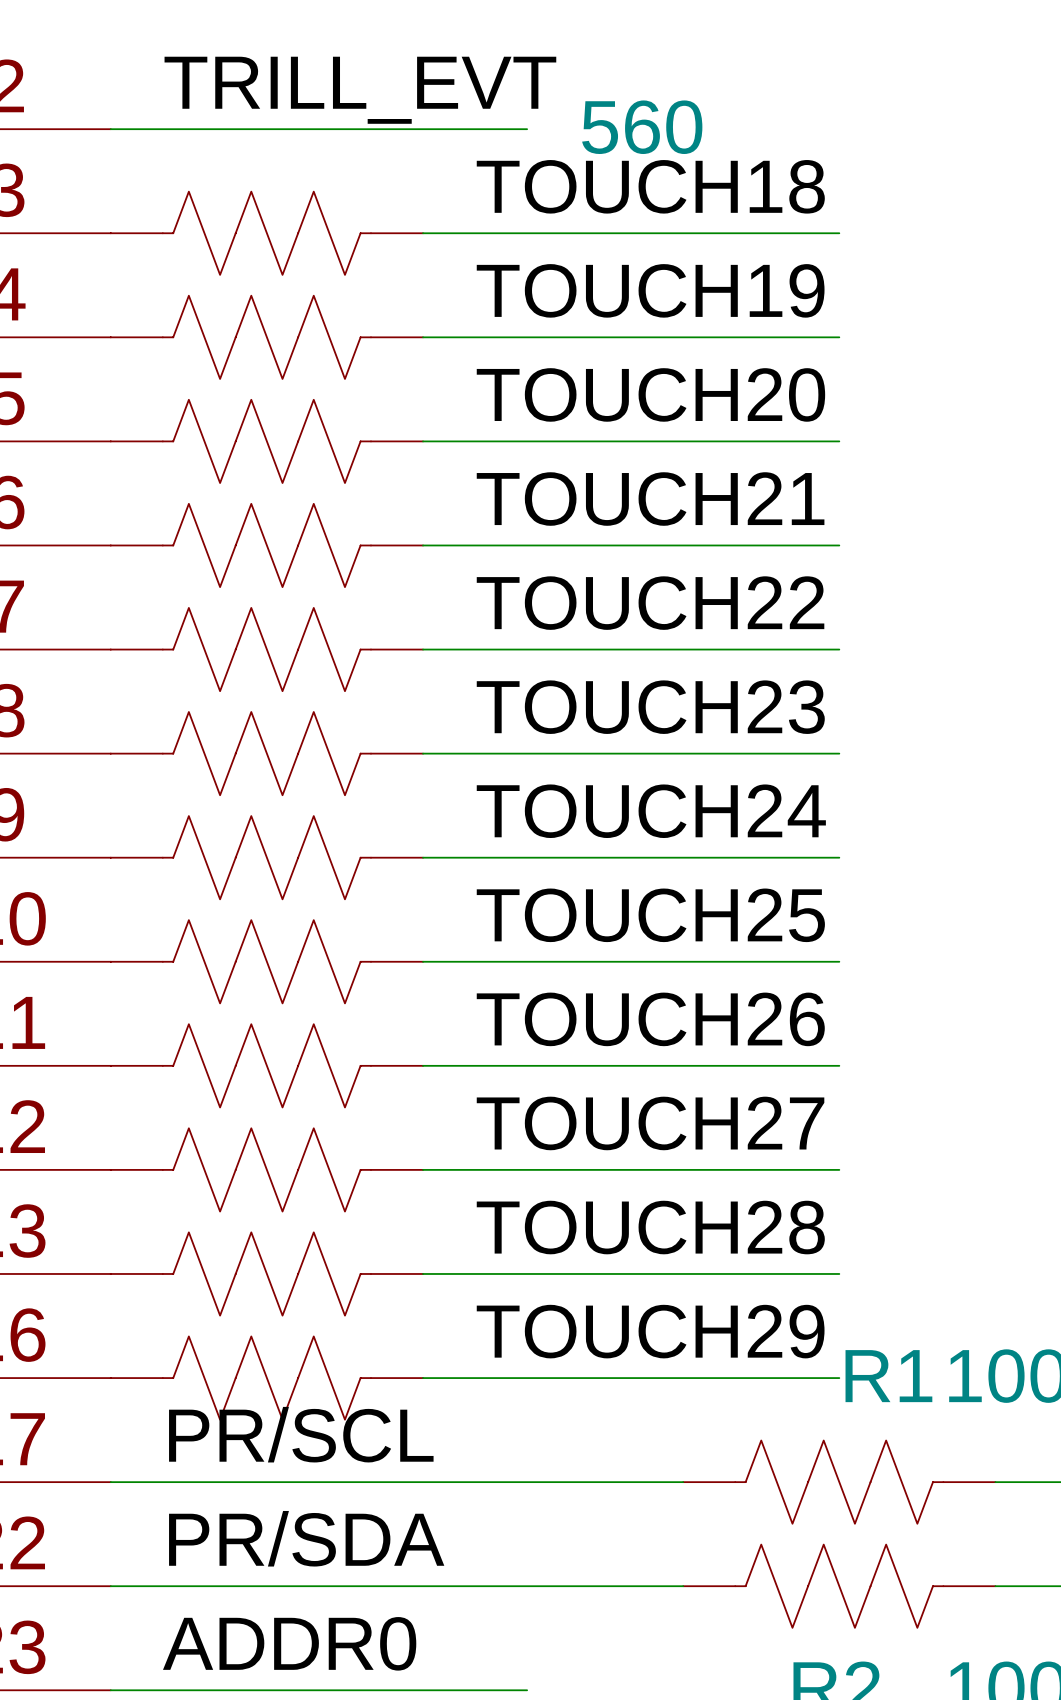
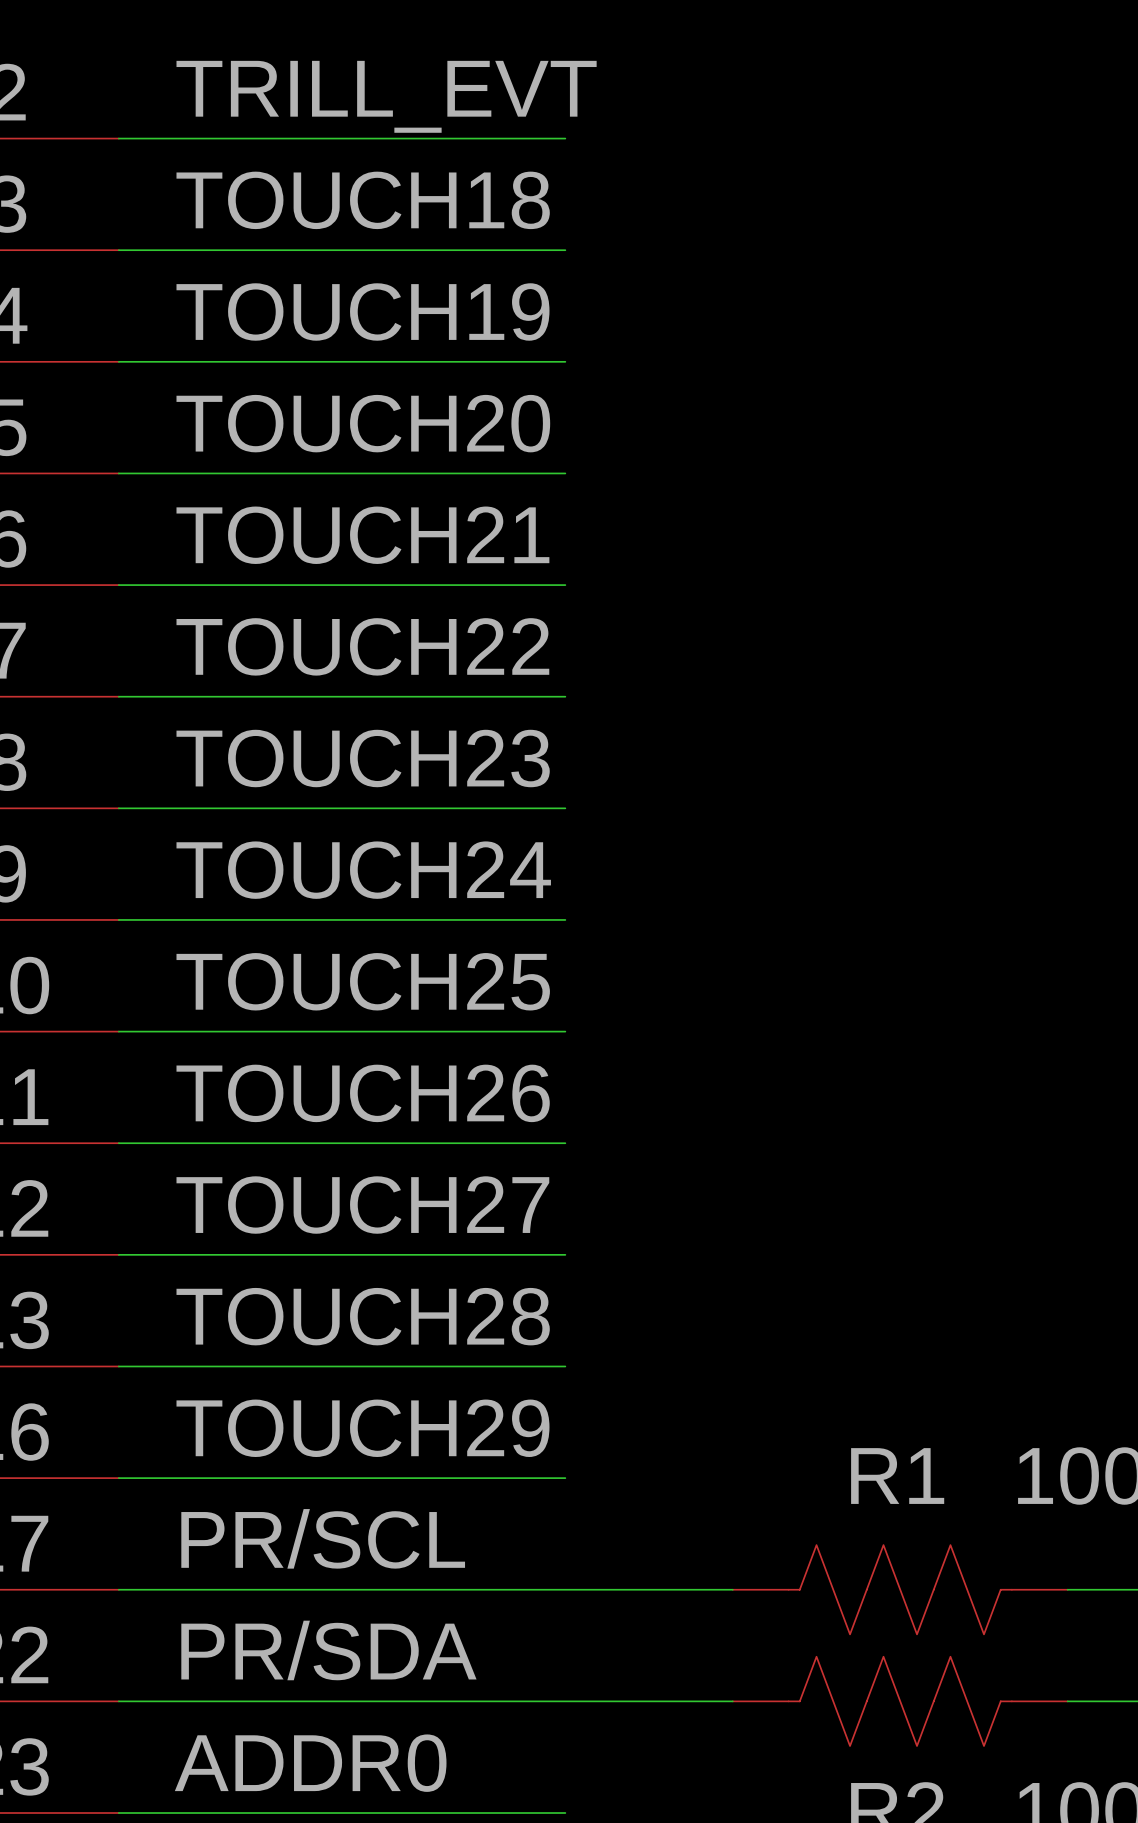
label position: TOUCH18 (650, 186) -> TOUCH18 (363, 200)
part: 560 (266, 233) -> none
wire: (527, 233) (839, 233) -> (118, 250) (453, 250)
label position: TOUCH19 (650, 290) -> TOUCH19 (362, 311)
part: (266, 337) -> none
wire: (527, 337) (839, 337) -> (118, 361) (453, 361)
label position: TOUCH20 (650, 394) -> TOUCH20 (363, 423)
part: (266, 441) -> none
wire: (527, 441) (839, 441) -> (118, 473) (453, 473)
label position: TOUCH21 (650, 499) -> TOUCH21 (362, 535)
part: (266, 545) -> none
wire: (527, 545) (839, 545) -> (118, 585) (453, 585)
label position: TOUCH22 (650, 603) -> TOUCH22 (362, 646)
part: (266, 649) -> none
wire: (527, 649) (839, 649) -> (118, 696) (453, 696)
label position: TOUCH23 (650, 707) -> TOUCH23 (363, 758)
part: (266, 753) -> none
wire: (527, 753) (839, 753) -> (118, 808) (453, 808)
label position: TOUCH24 (651, 811) -> TOUCH24 (363, 870)
part: (266, 857) -> none
wire: (527, 857) (839, 857) -> (118, 919) (453, 919)
label position: TOUCH25 (650, 915) -> TOUCH25 (363, 981)
part: (266, 961) -> none
wire: (527, 961) (839, 961) -> (118, 1031) (453, 1031)
label position: TOUCH26 (650, 1019) -> TOUCH26 (363, 1093)
part: (266, 1065) -> none
wire: (527, 1065) (839, 1065) -> (118, 1143) (453, 1143)
label position: TOUCH27 (650, 1123) -> TOUCH27 (362, 1205)
part: (266, 1169) -> none
wire: (527, 1169) (839, 1169) -> (118, 1254) (453, 1254)
label position: TOUCH28 (650, 1227) -> TOUCH28 (363, 1316)
part: (266, 1273) -> none
wire: (527, 1273) (839, 1273) -> (118, 1366) (453, 1366)
label position: TOUCH29 (650, 1331) -> TOUCH29 (362, 1428)
R1 name position: R1 (888, 1376) -> R1 (897, 1476)
part: (266, 1378) -> none
wire: (527, 1378) (839, 1378) -> (118, 1478) (453, 1478)

